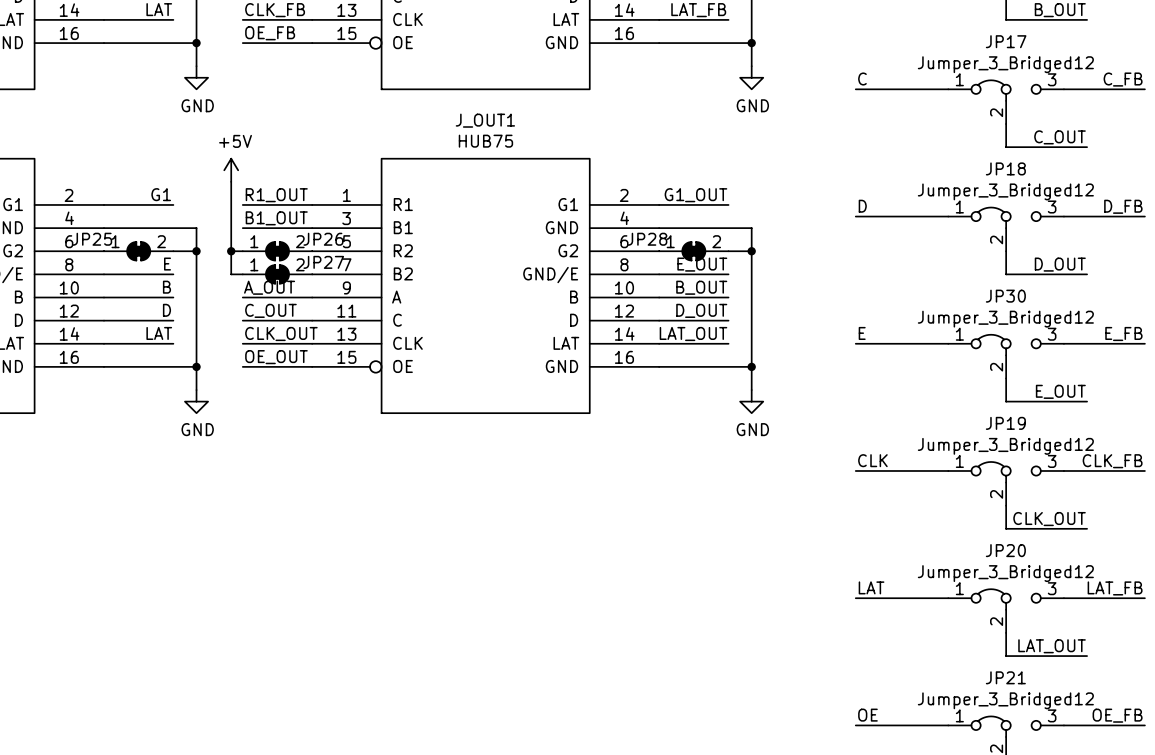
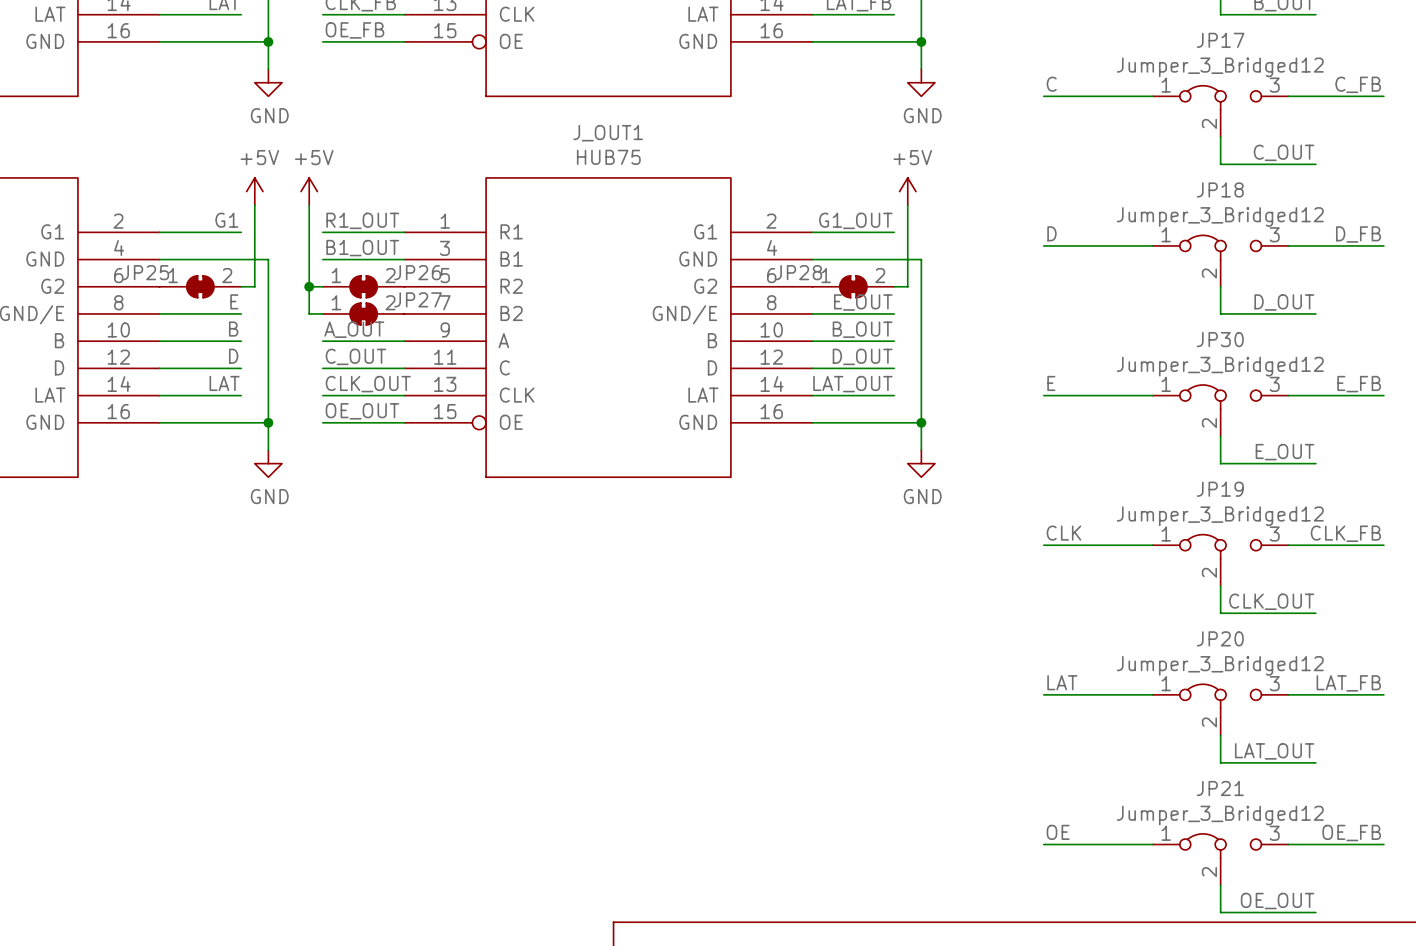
power symbol: none -> +5V (254, 191)
power symbol: none -> +5V (907, 191)
wire: (184, 251) (196, 251) -> (254, 286) (254, 205)
junction: (196, 251) -> none
wire: (740, 251) (751, 251) -> (907, 286) (907, 205)
junction: (751, 251) -> none

